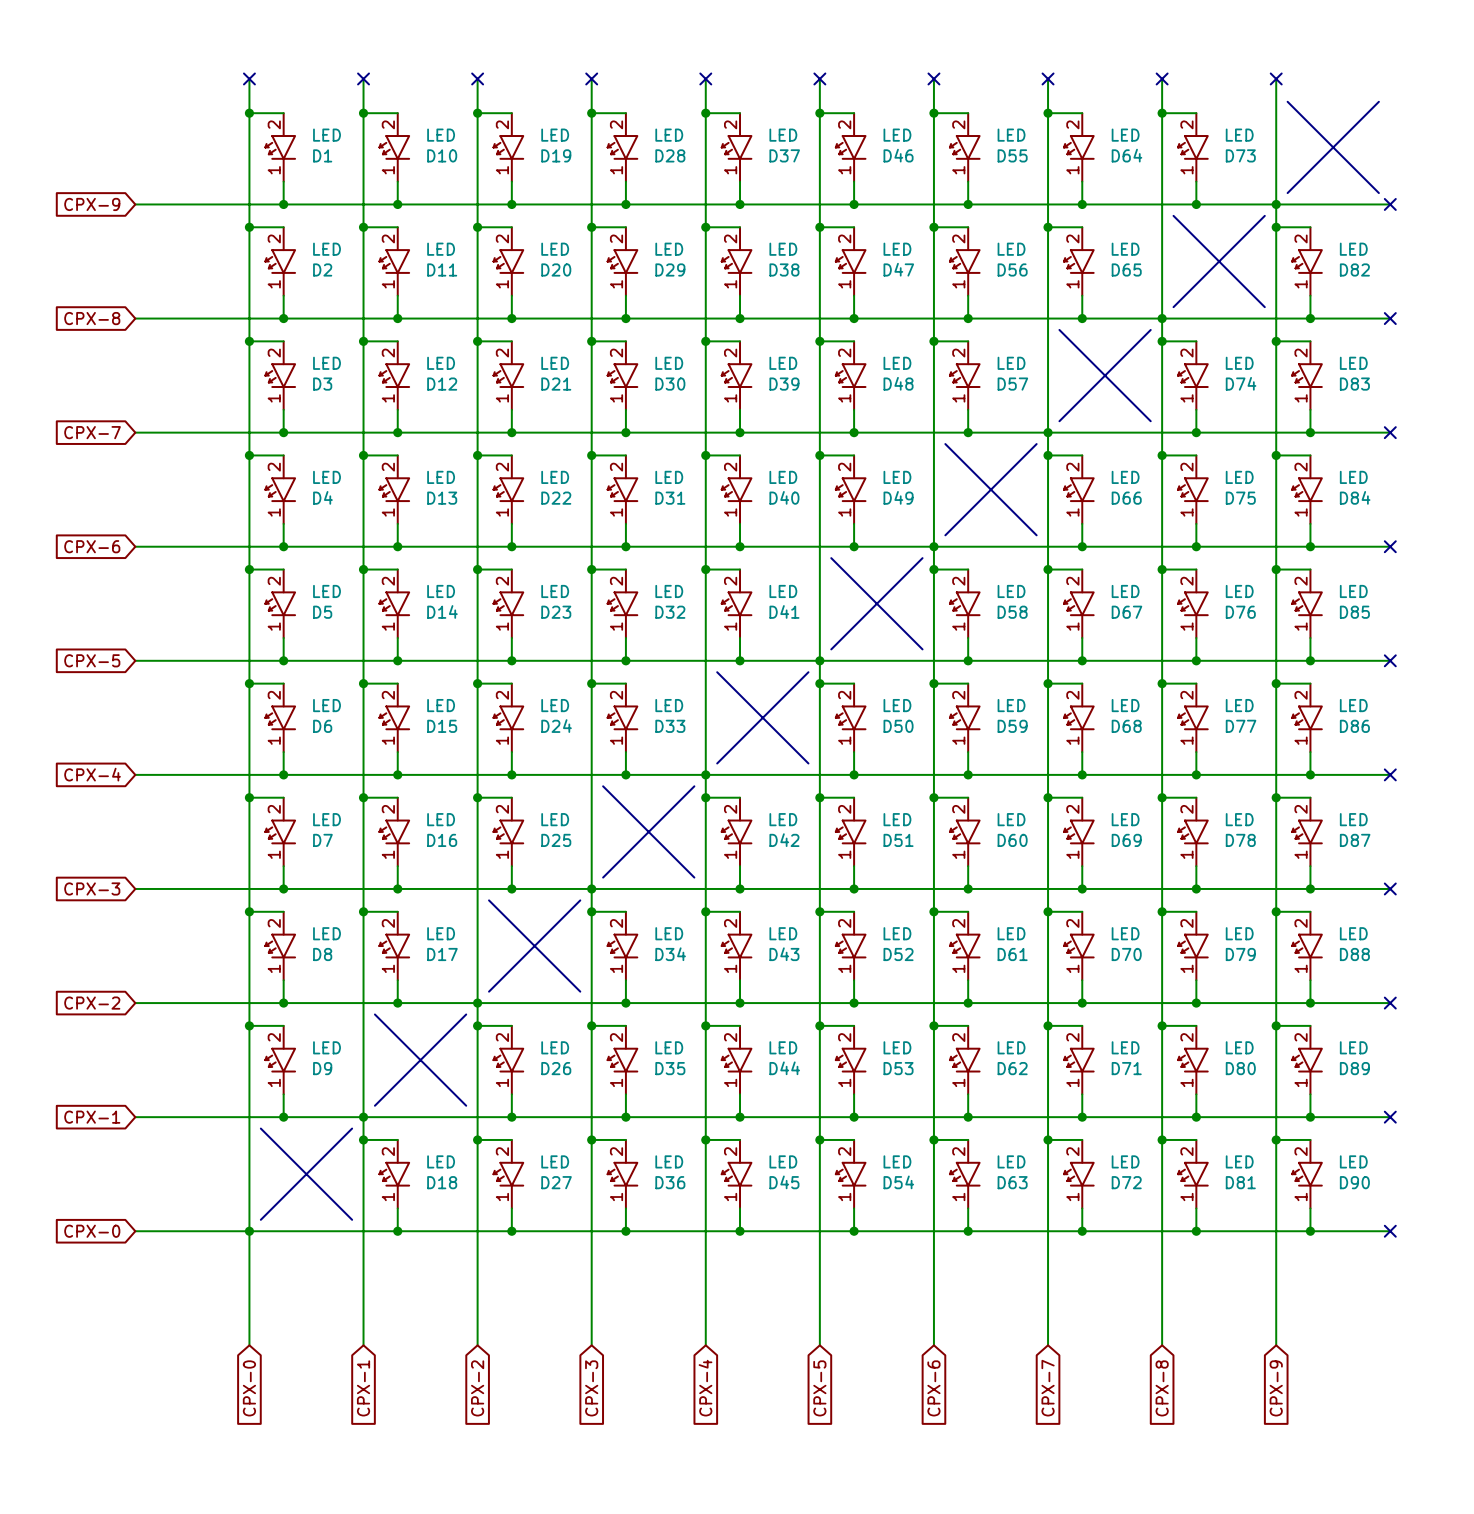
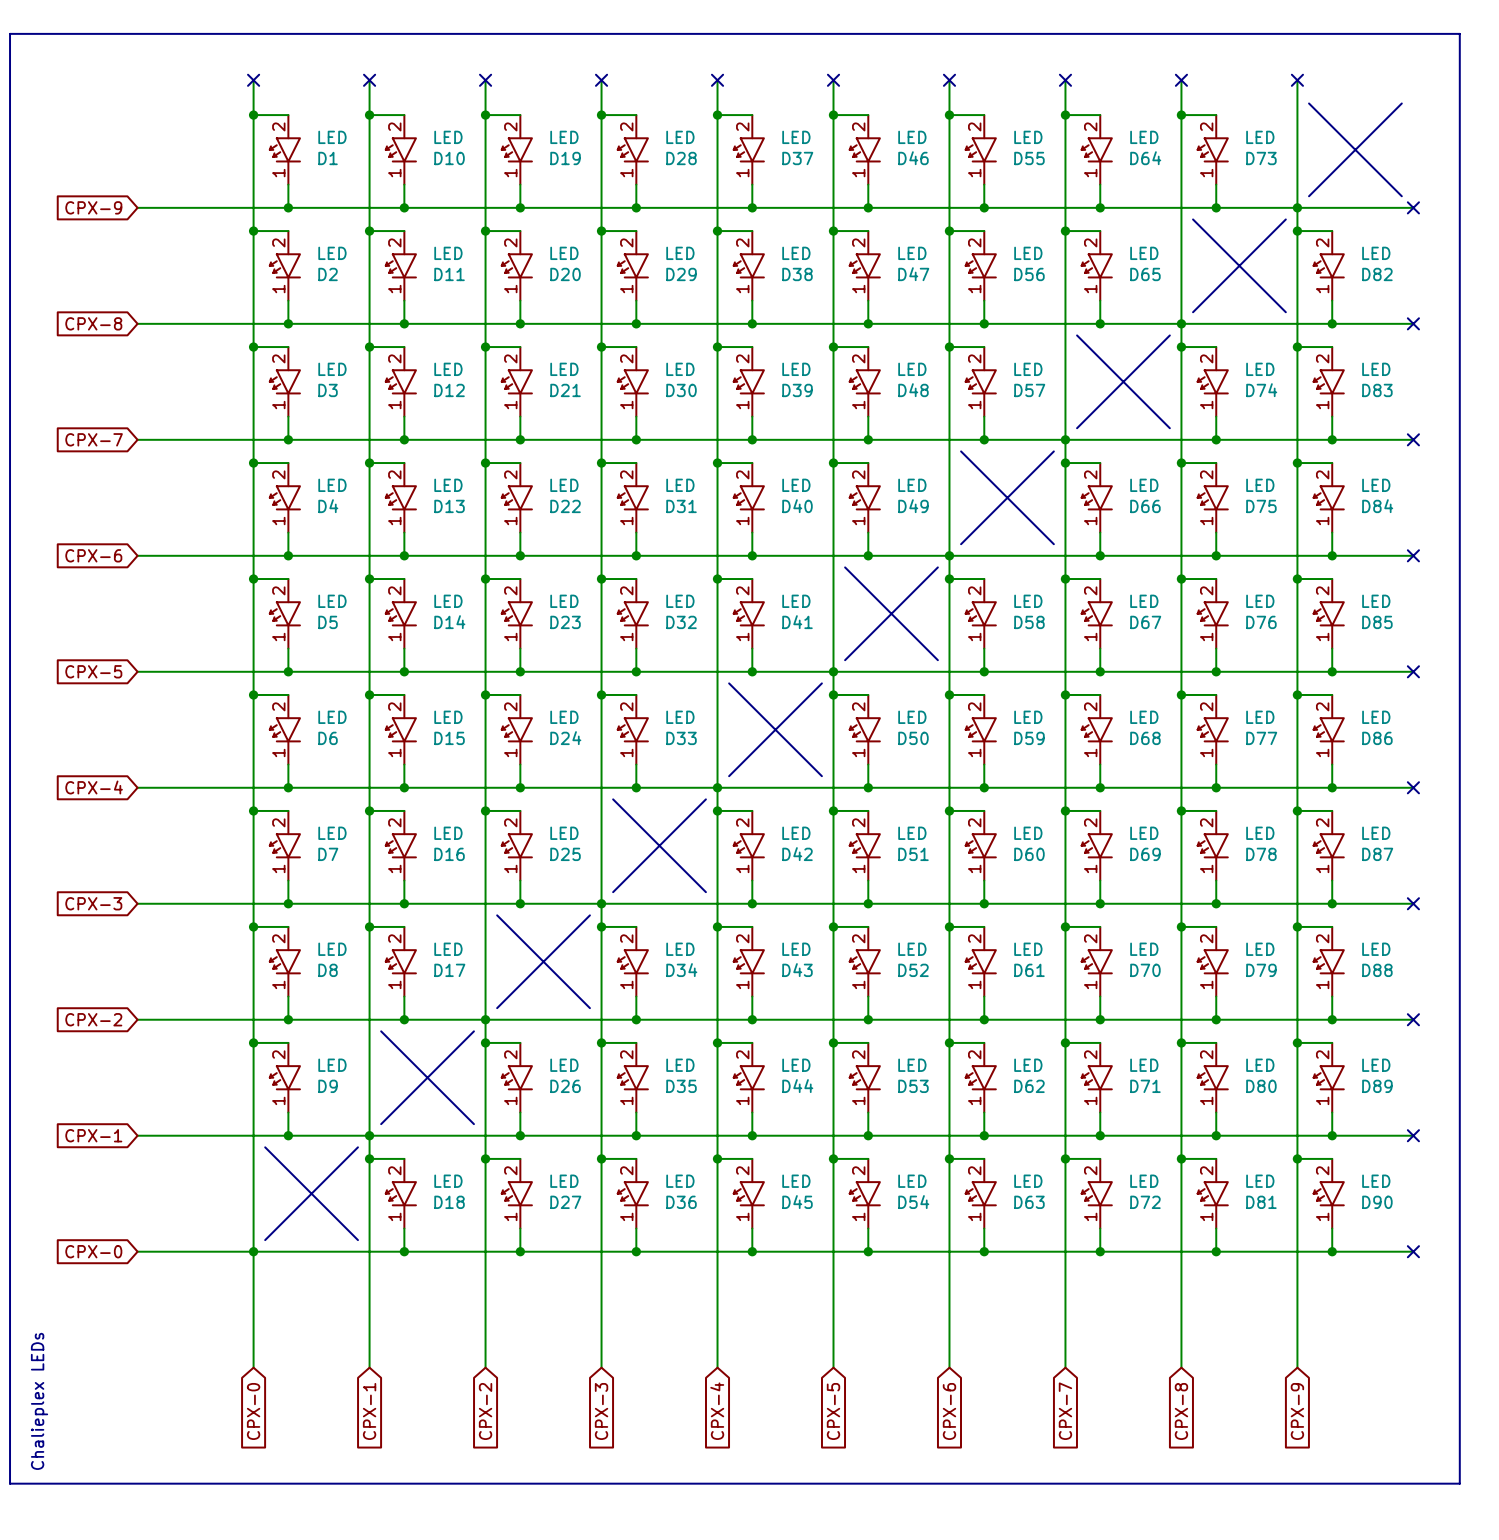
line: none -> (10, 33) (10, 1483) (1459, 1483) (1459, 33) (10, 33)
text: none -> Chalieplex LEDs (39, 1401)

